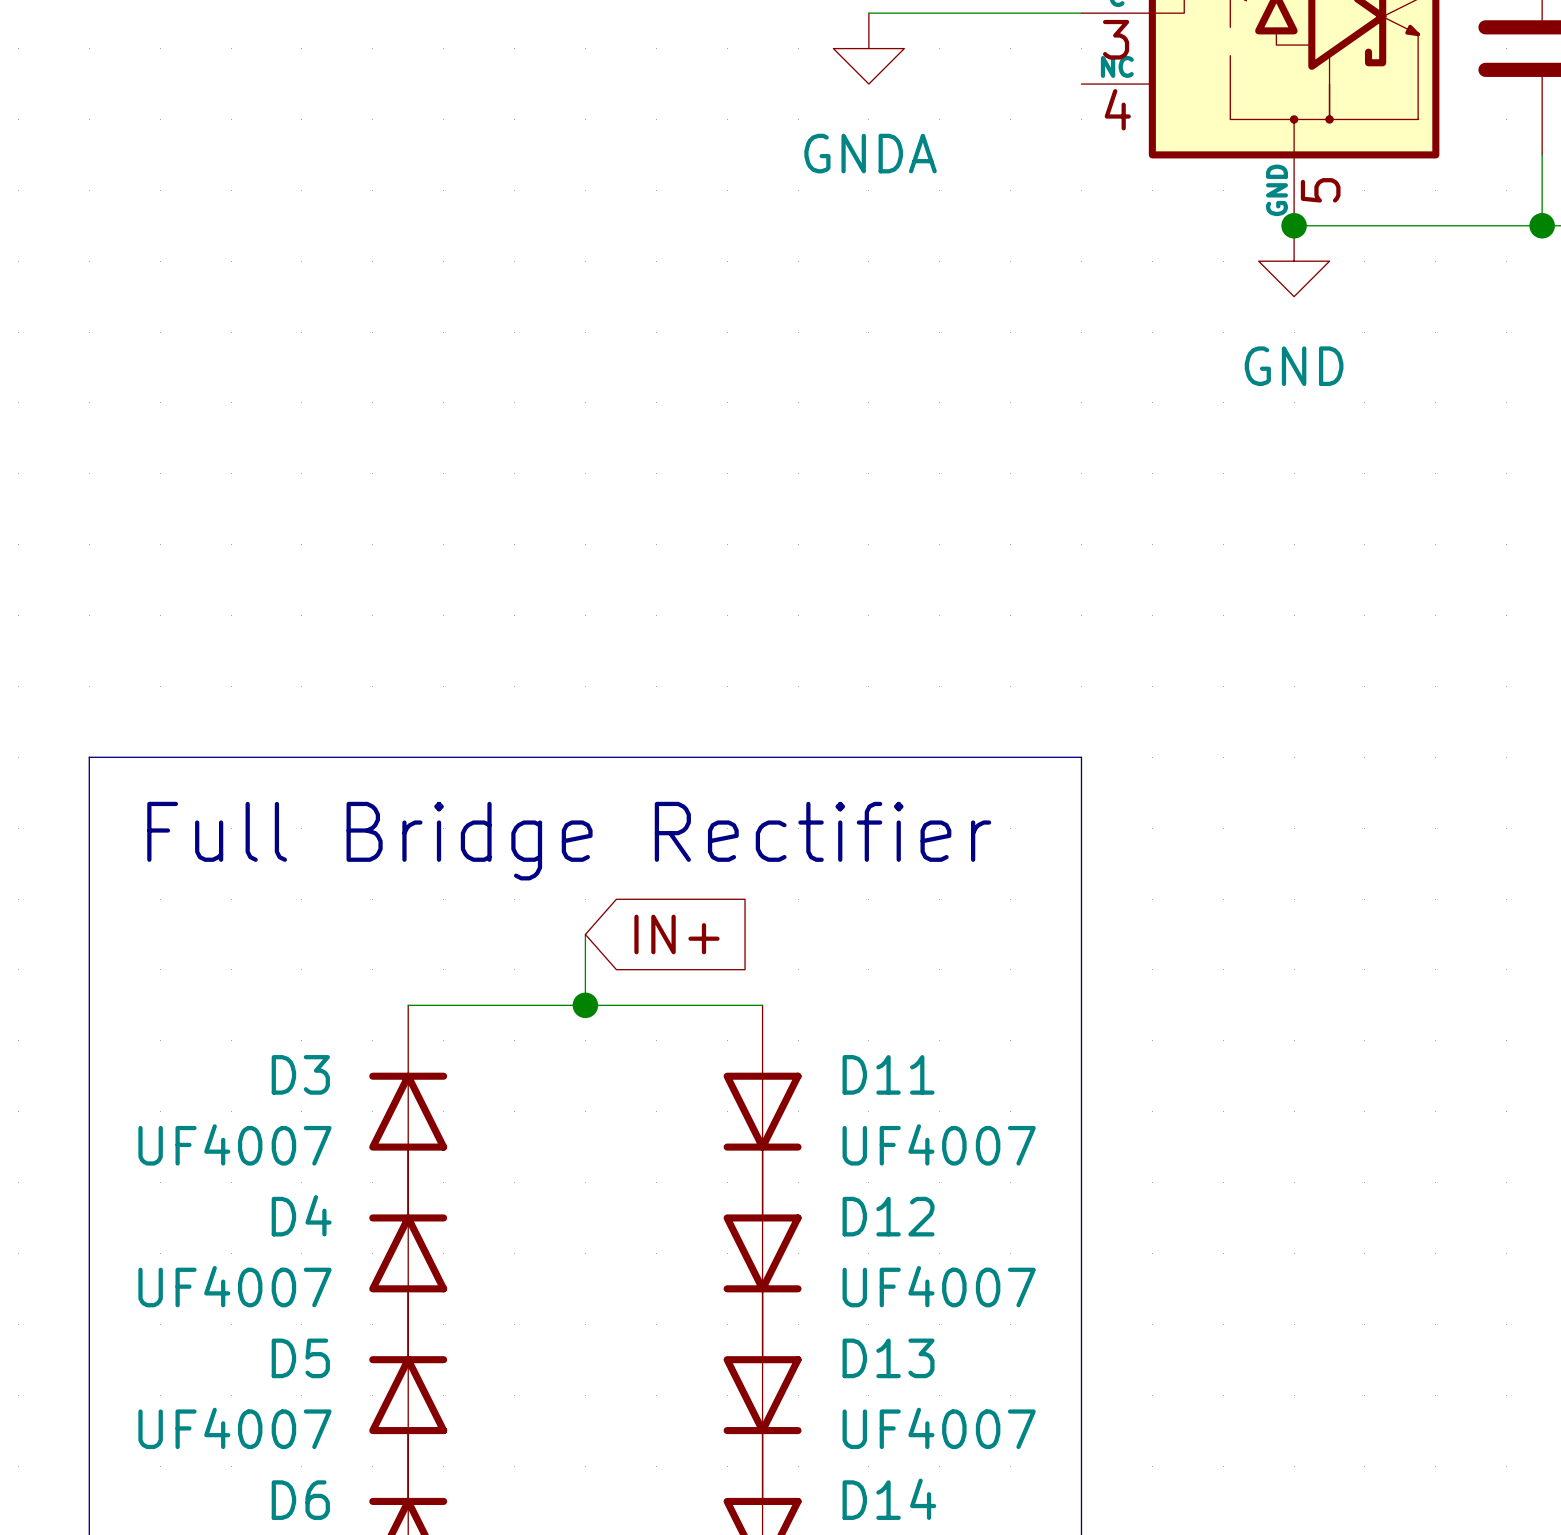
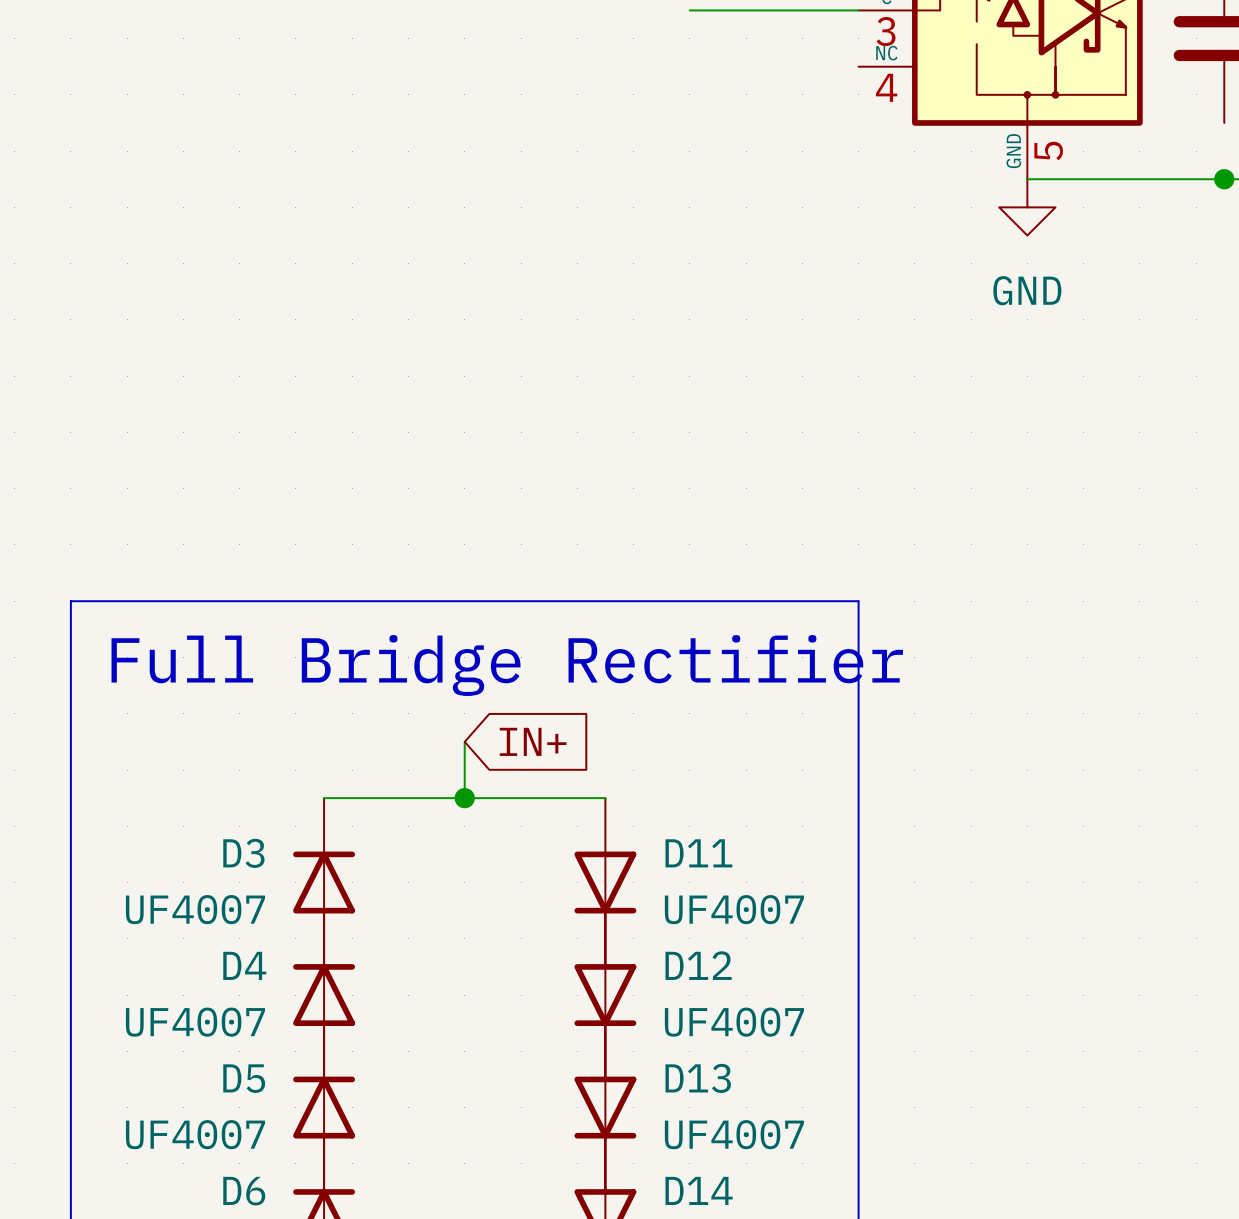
power symbol: GNDA (868, 48) -> none
wire: (1542, 154) (1542, 225) -> none
junction: (1294, 225) -> none

